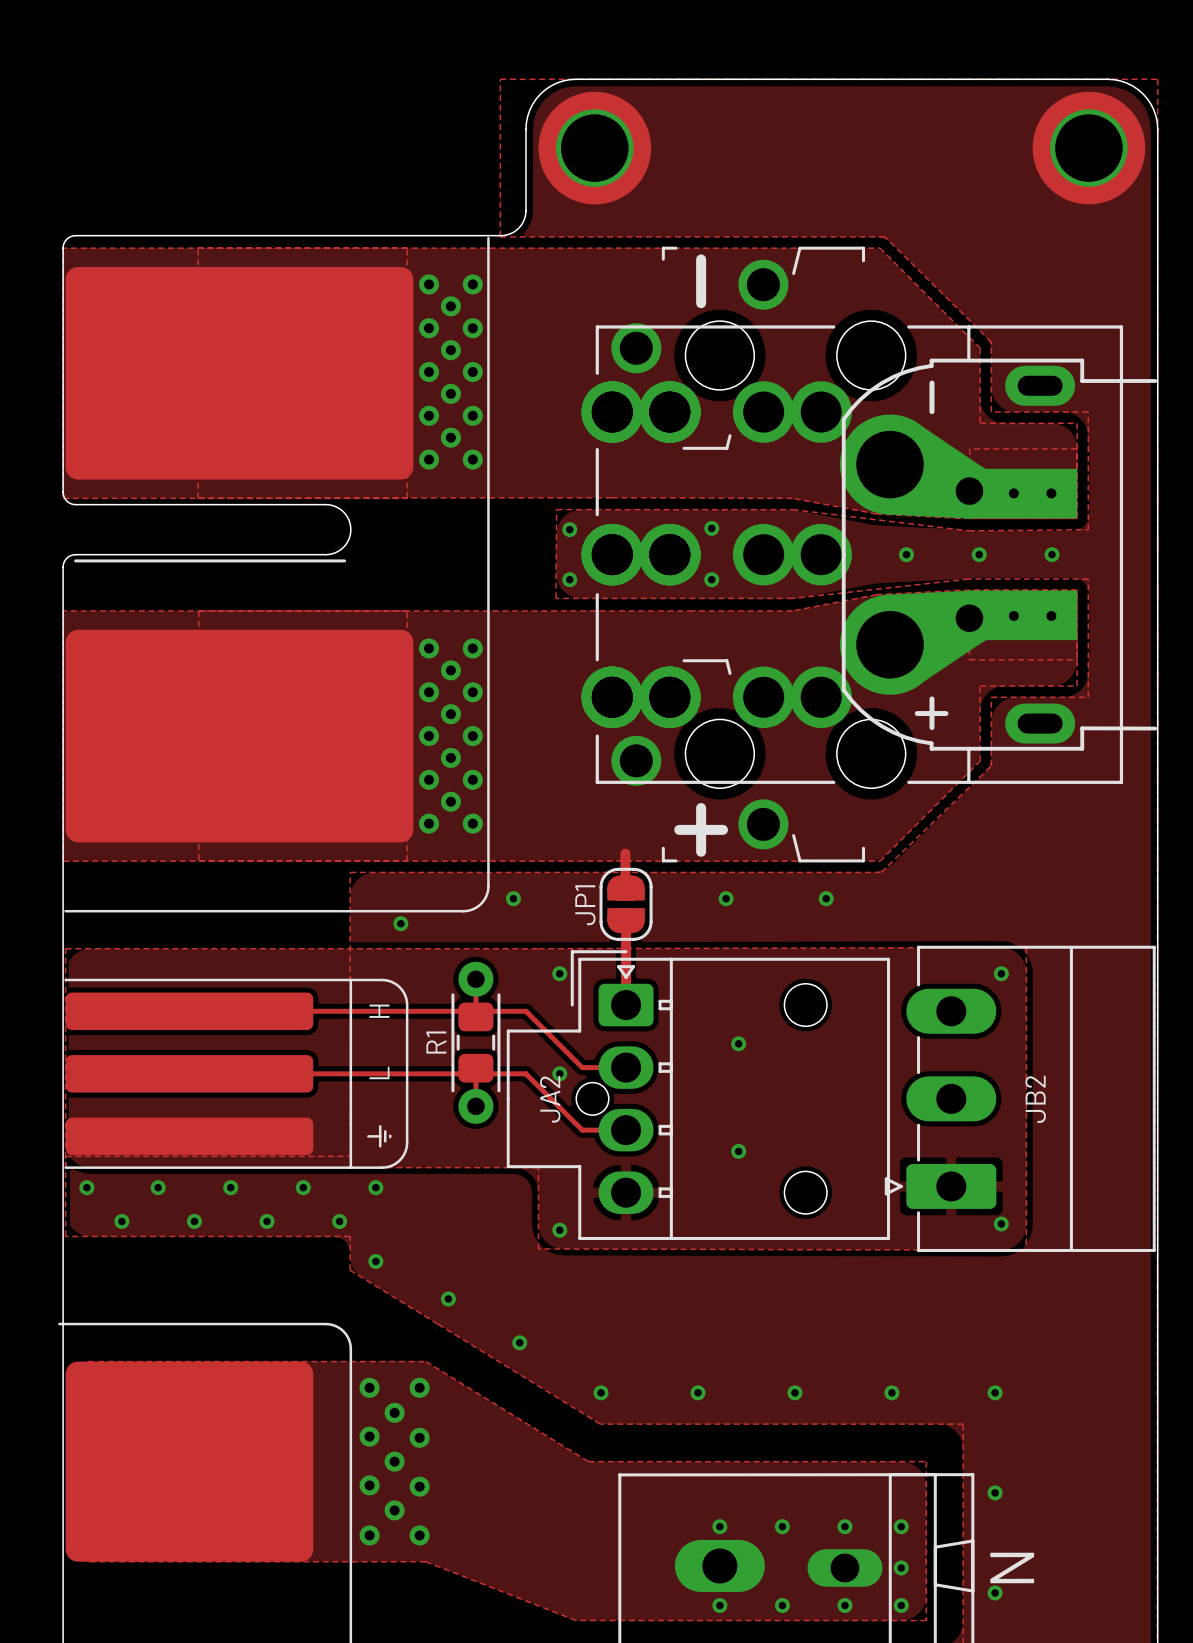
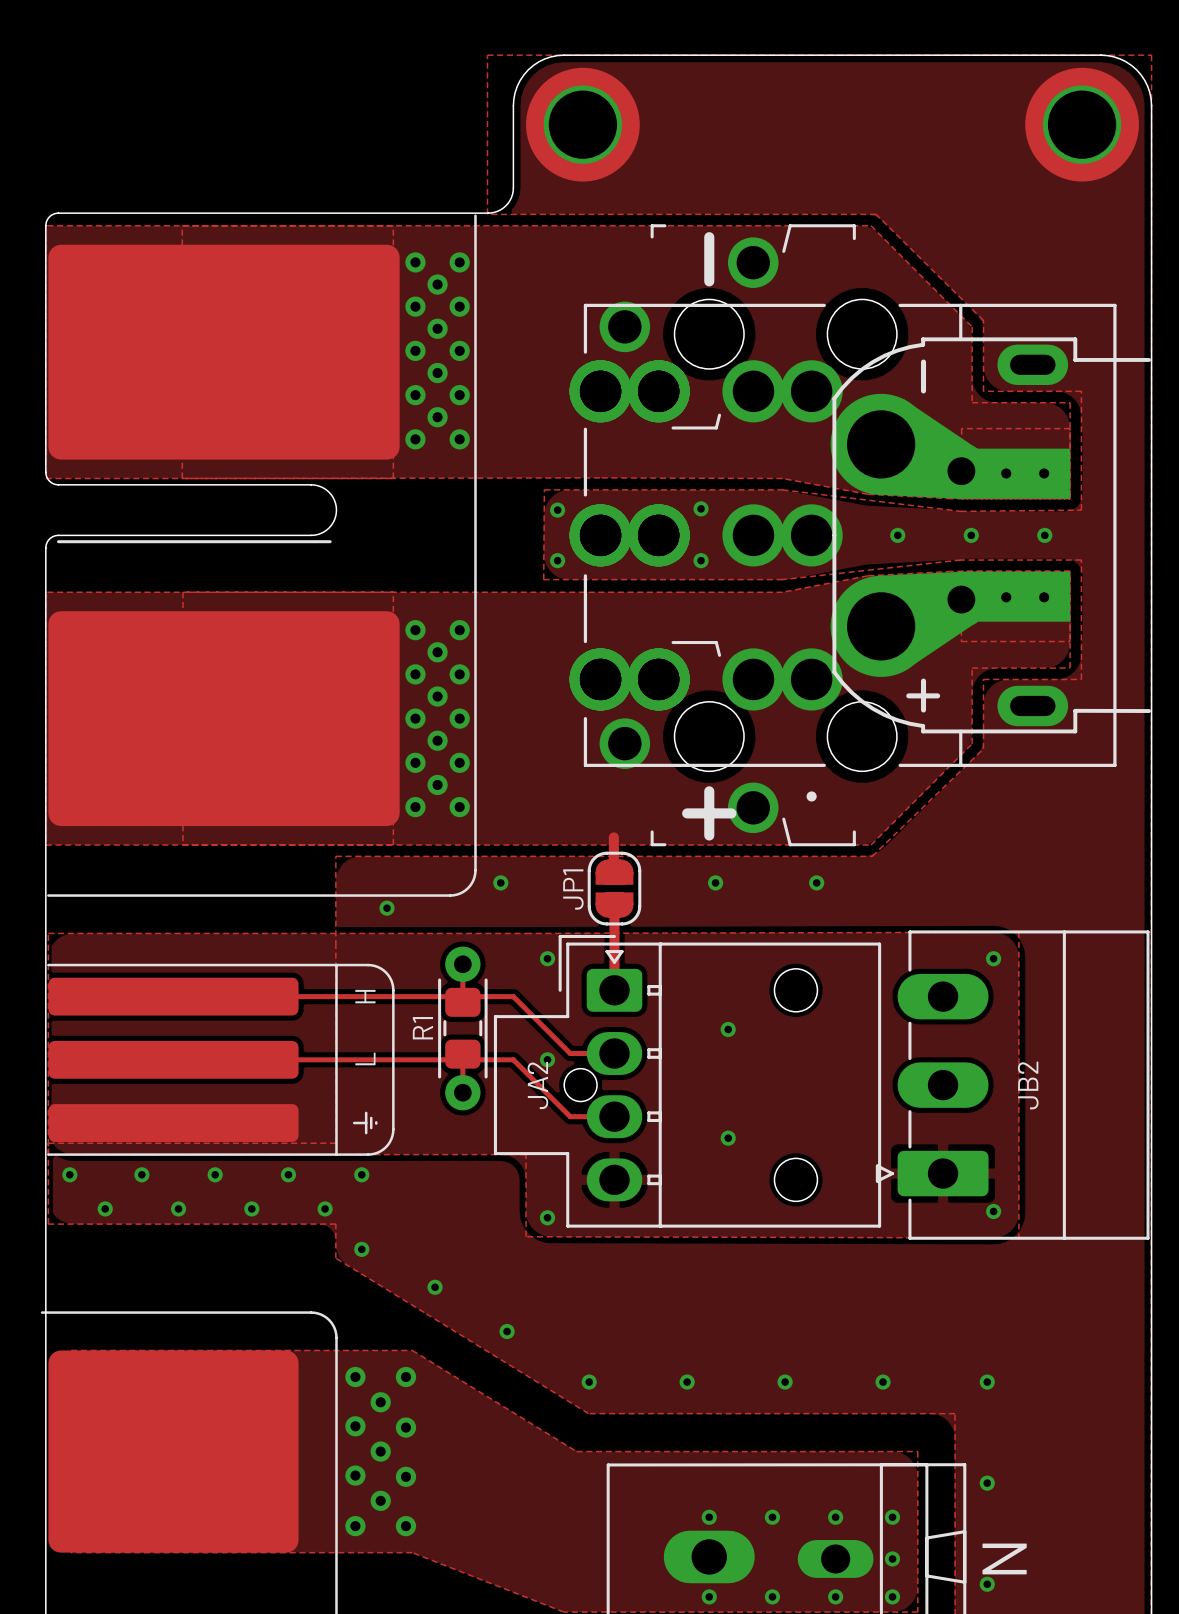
line: (701, 259) (701, 303) -> (709, 237) (709, 281)
part footprint: [581, 321, 1124, 789] -> [569, 299, 1117, 802]
line: (701, 807) (701, 851) -> (709, 791) (709, 835)
line: (679, 829) (697, 829) -> (712, 813) (731, 813)

